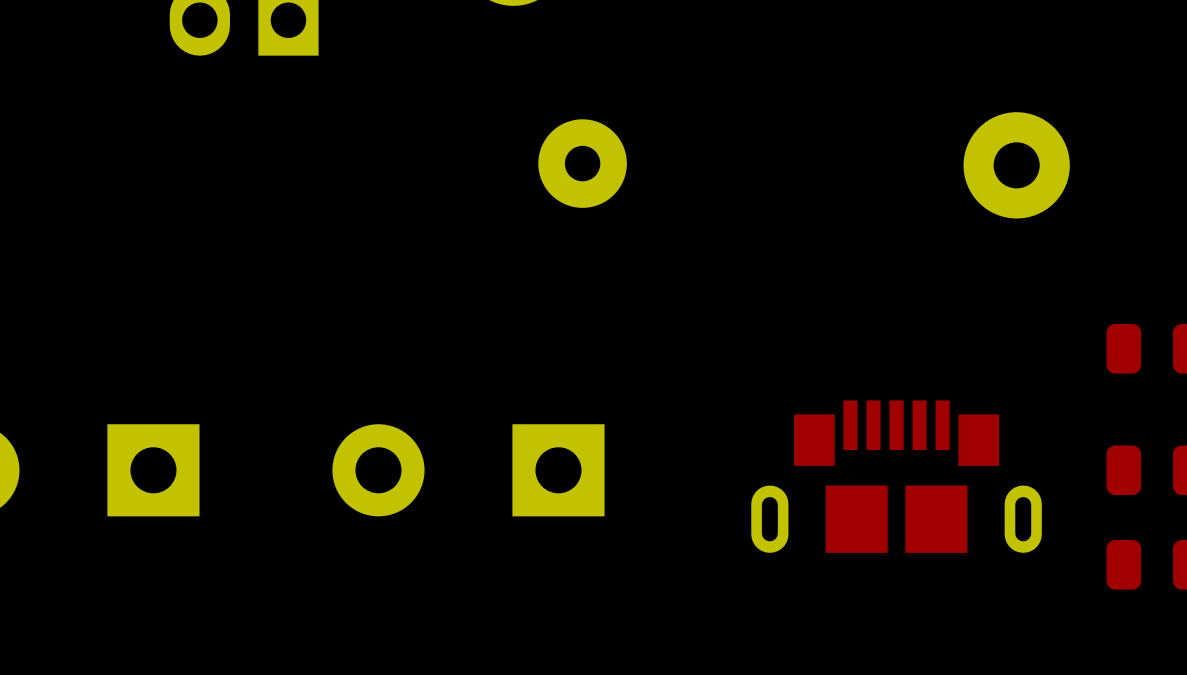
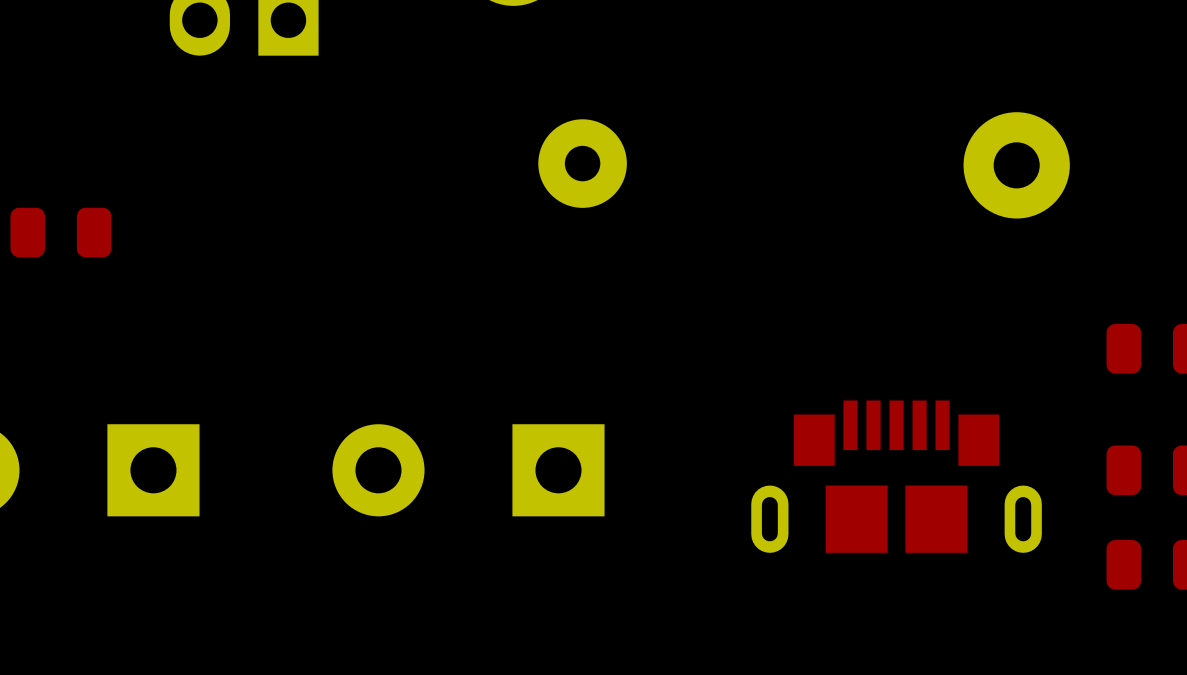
part: none -> (60, 232)

